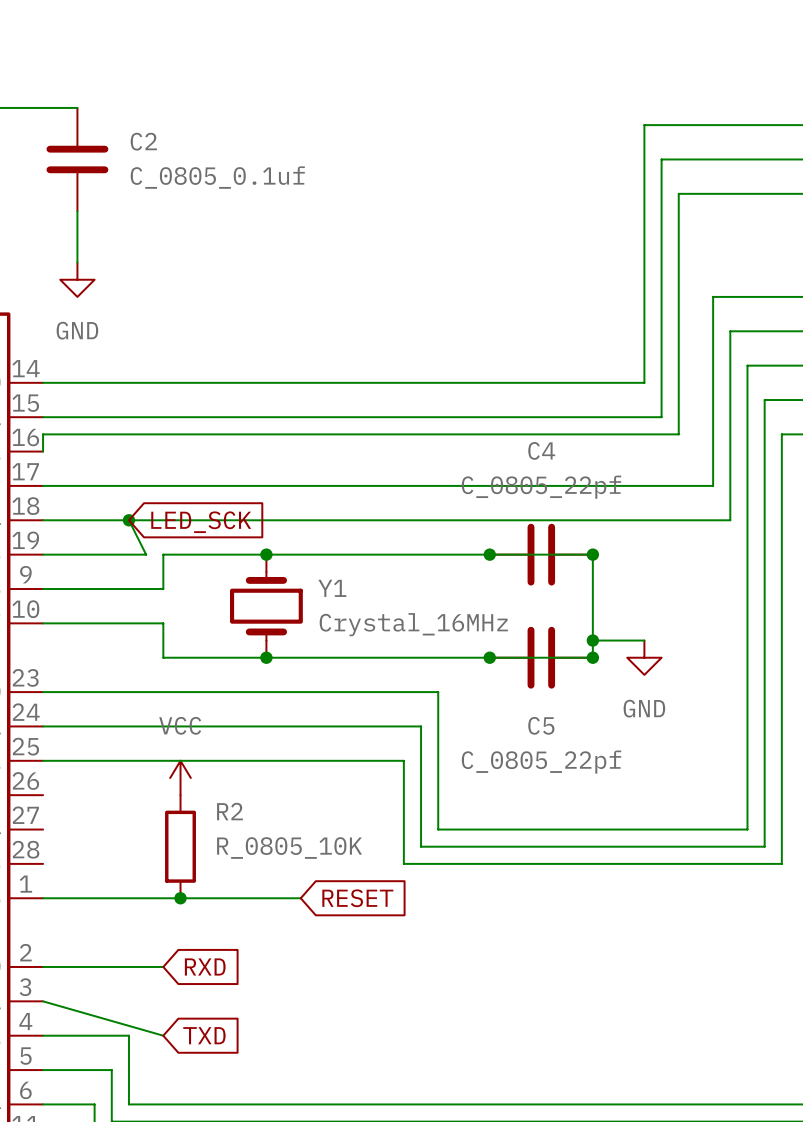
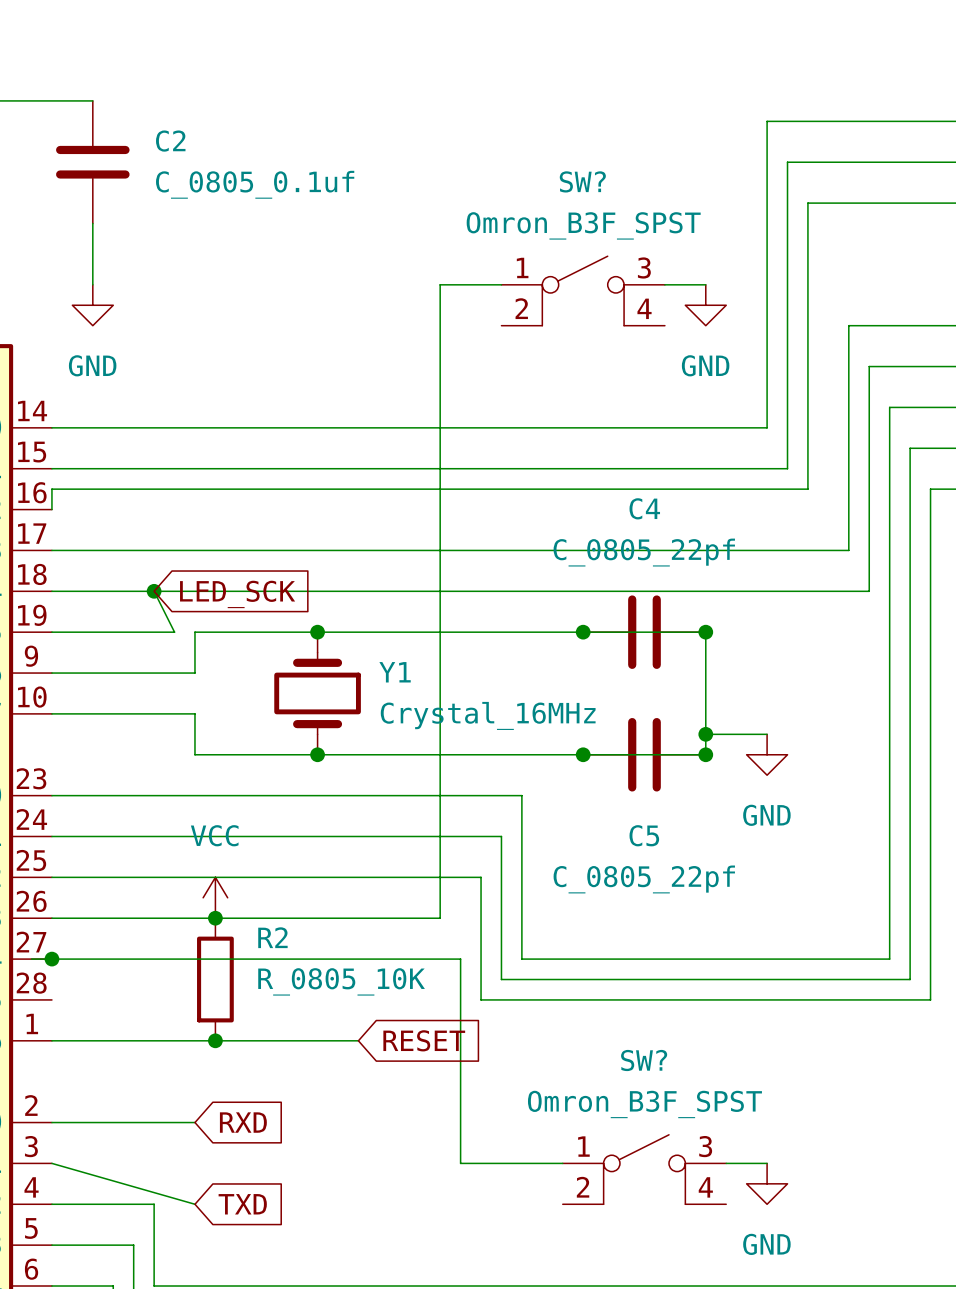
wire: none -> (501, 284) (440, 284) (440, 918) (51, 918)
wire: none -> (664, 284) (705, 284)
SW?: none -> Omron_B3F_SPST (583, 290)
power symbol: none -> GND (705, 305)
junction: none -> (215, 918)
wire: none -> (31, 959) (460, 959) (460, 1163) (562, 1163)
junction: none -> (51, 959)
wire: none -> (726, 1163) (767, 1163)
SW?: none -> Omron_B3F_SPST (644, 1169)
power symbol: none -> GND (767, 1183)

